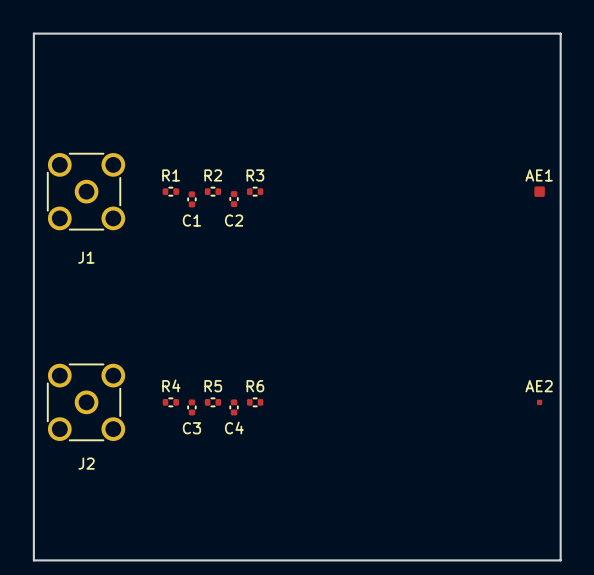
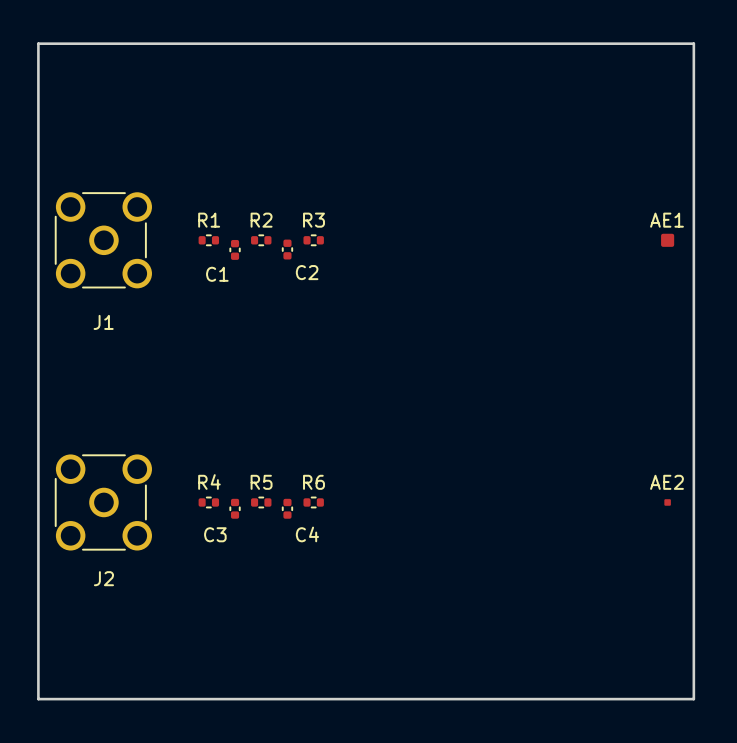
C1 name position: C1 (191, 220) -> C1 (217, 274)
C2 name position: C2 (234, 220) -> C2 (307, 272)
C3 name position: C3 (191, 428) -> C3 (215, 534)
C4 name position: C4 (234, 428) -> C4 (307, 534)

